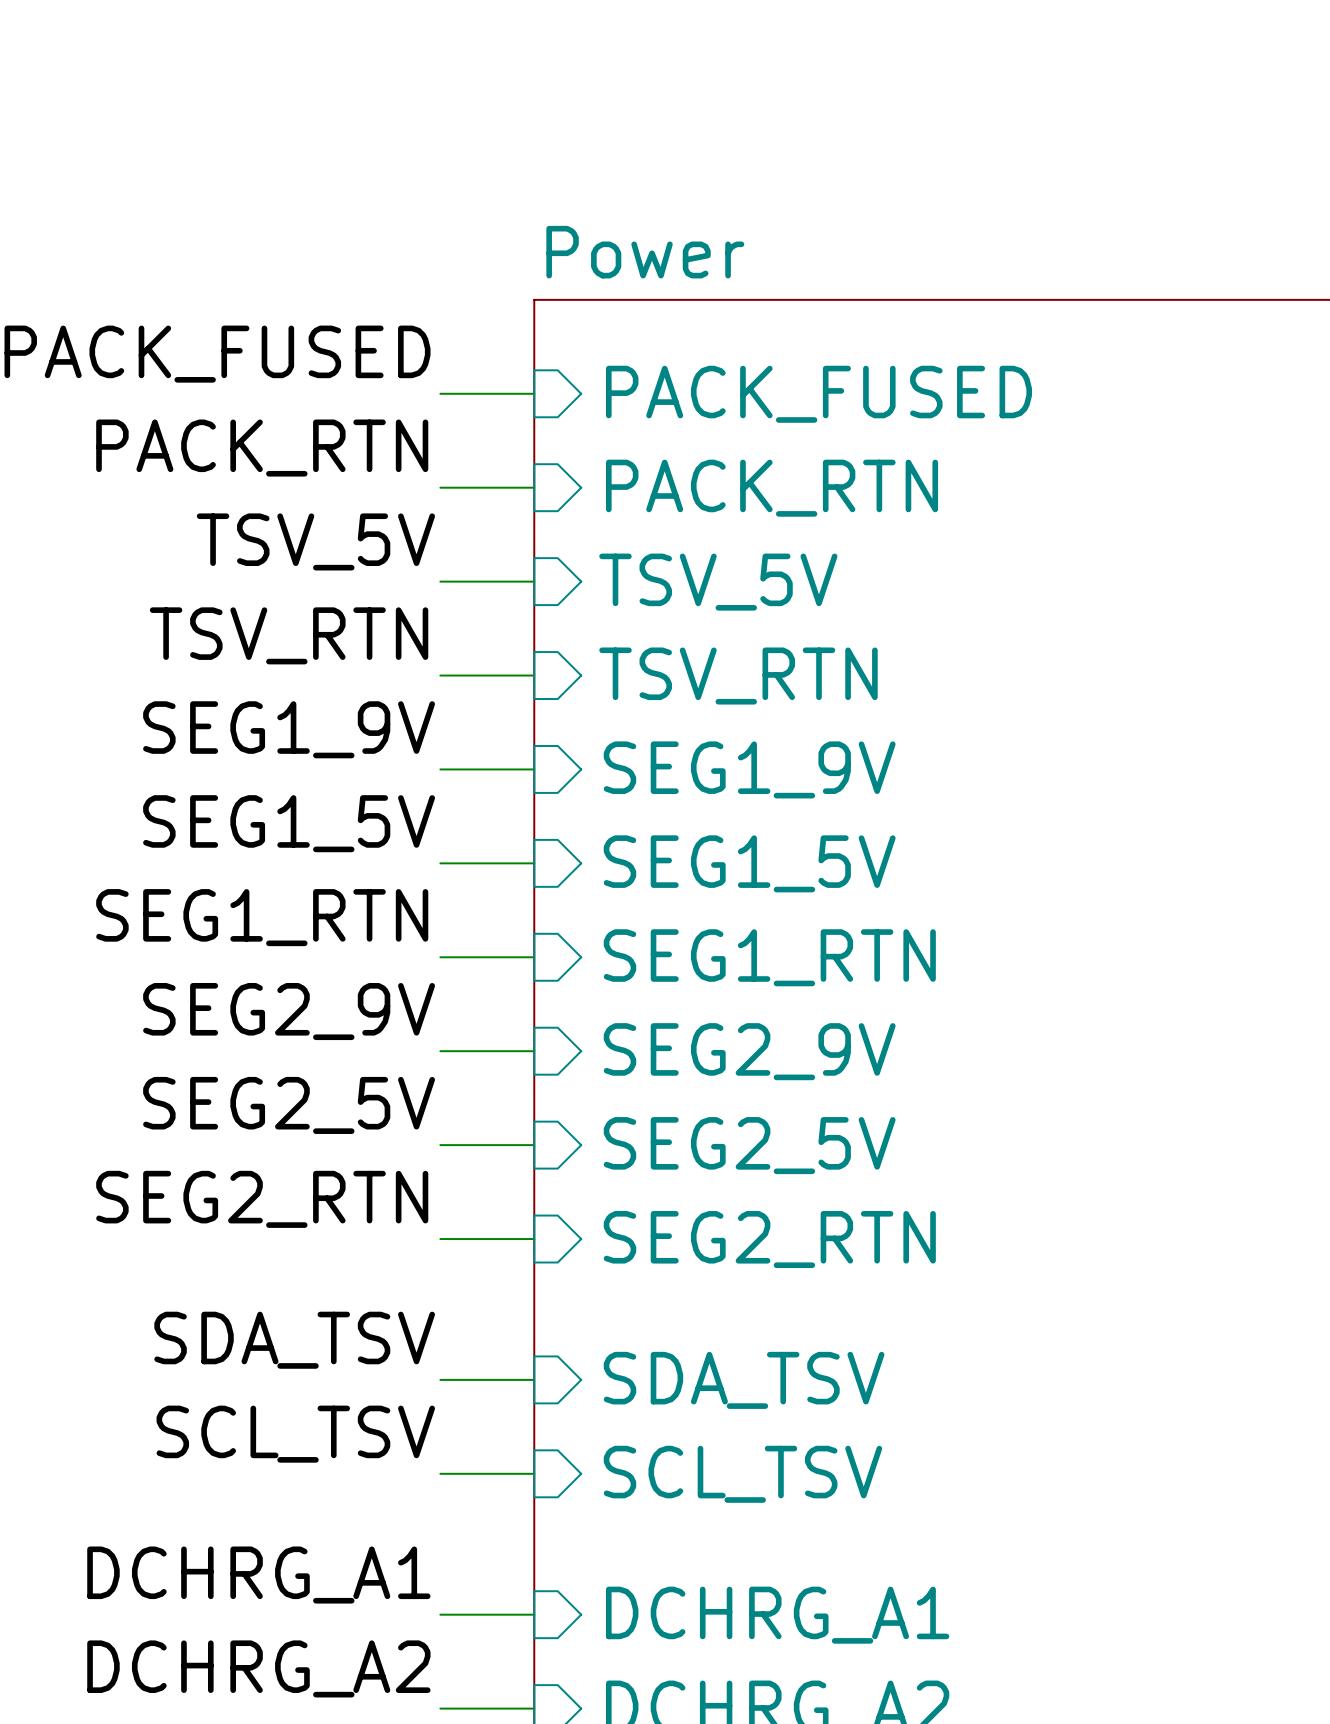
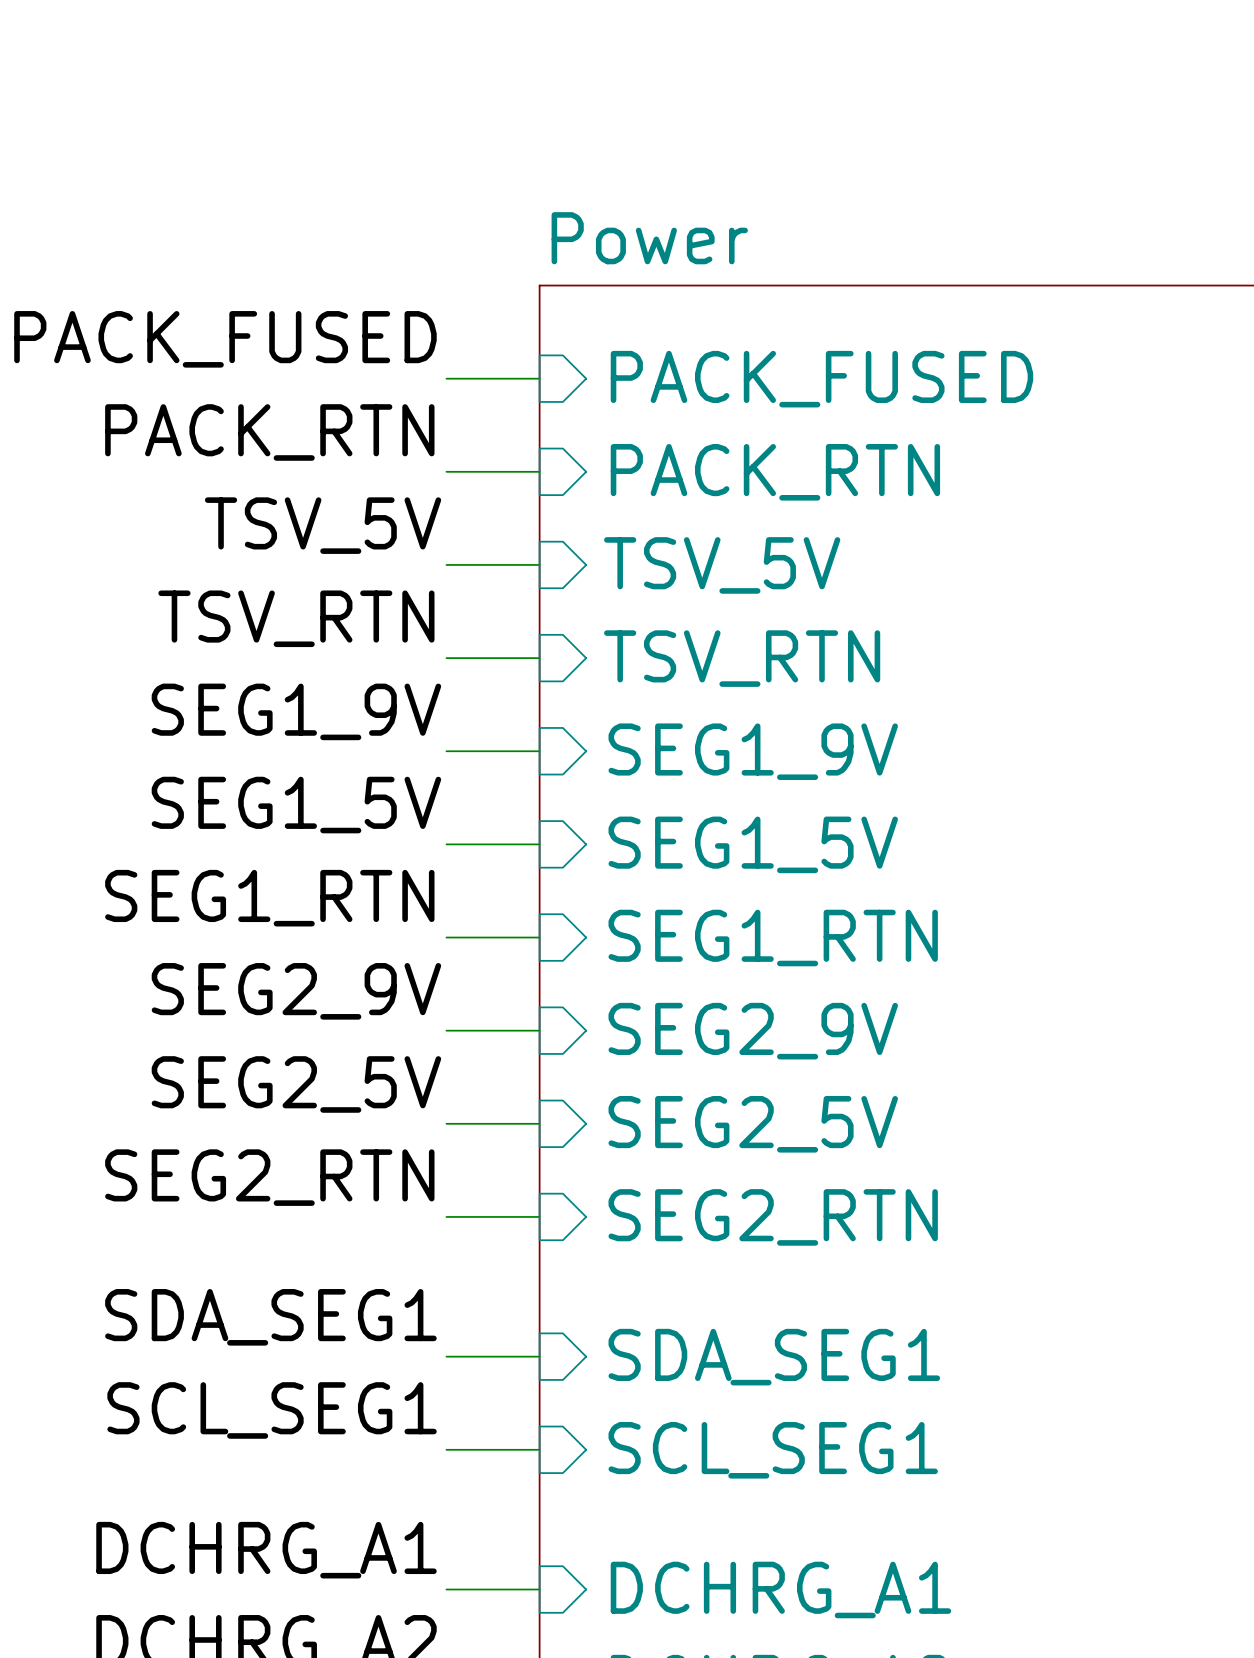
label: SDA_TSV (294, 1340) -> SDA_SEG1 (270, 1317)
sheet pin: SDA_TSV (744, 1380) -> SDA_SEG1 (774, 1357)
label: SCL_TSV (295, 1434) -> SCL_SEG1 (272, 1410)
sheet pin: SCL_TSV (742, 1474) -> SCL_SEG1 (773, 1450)

